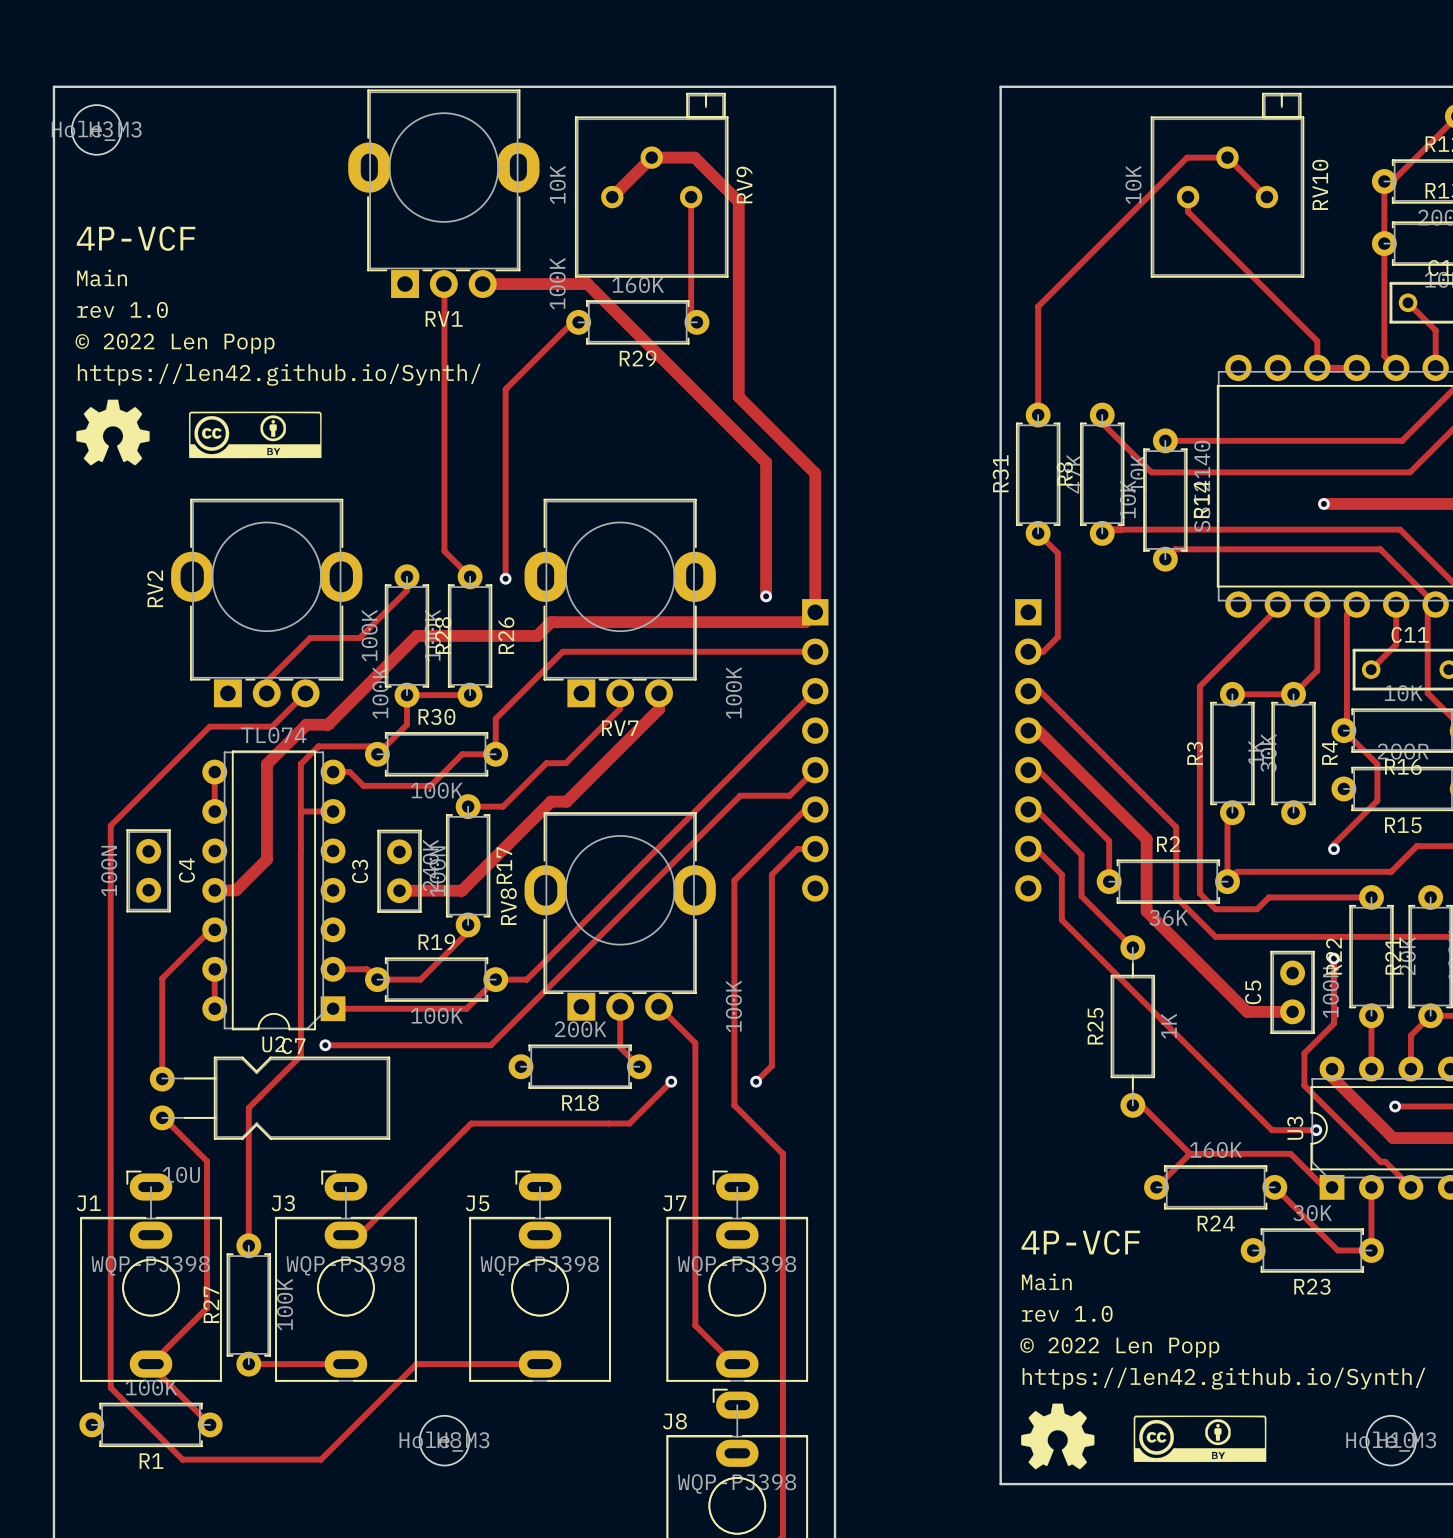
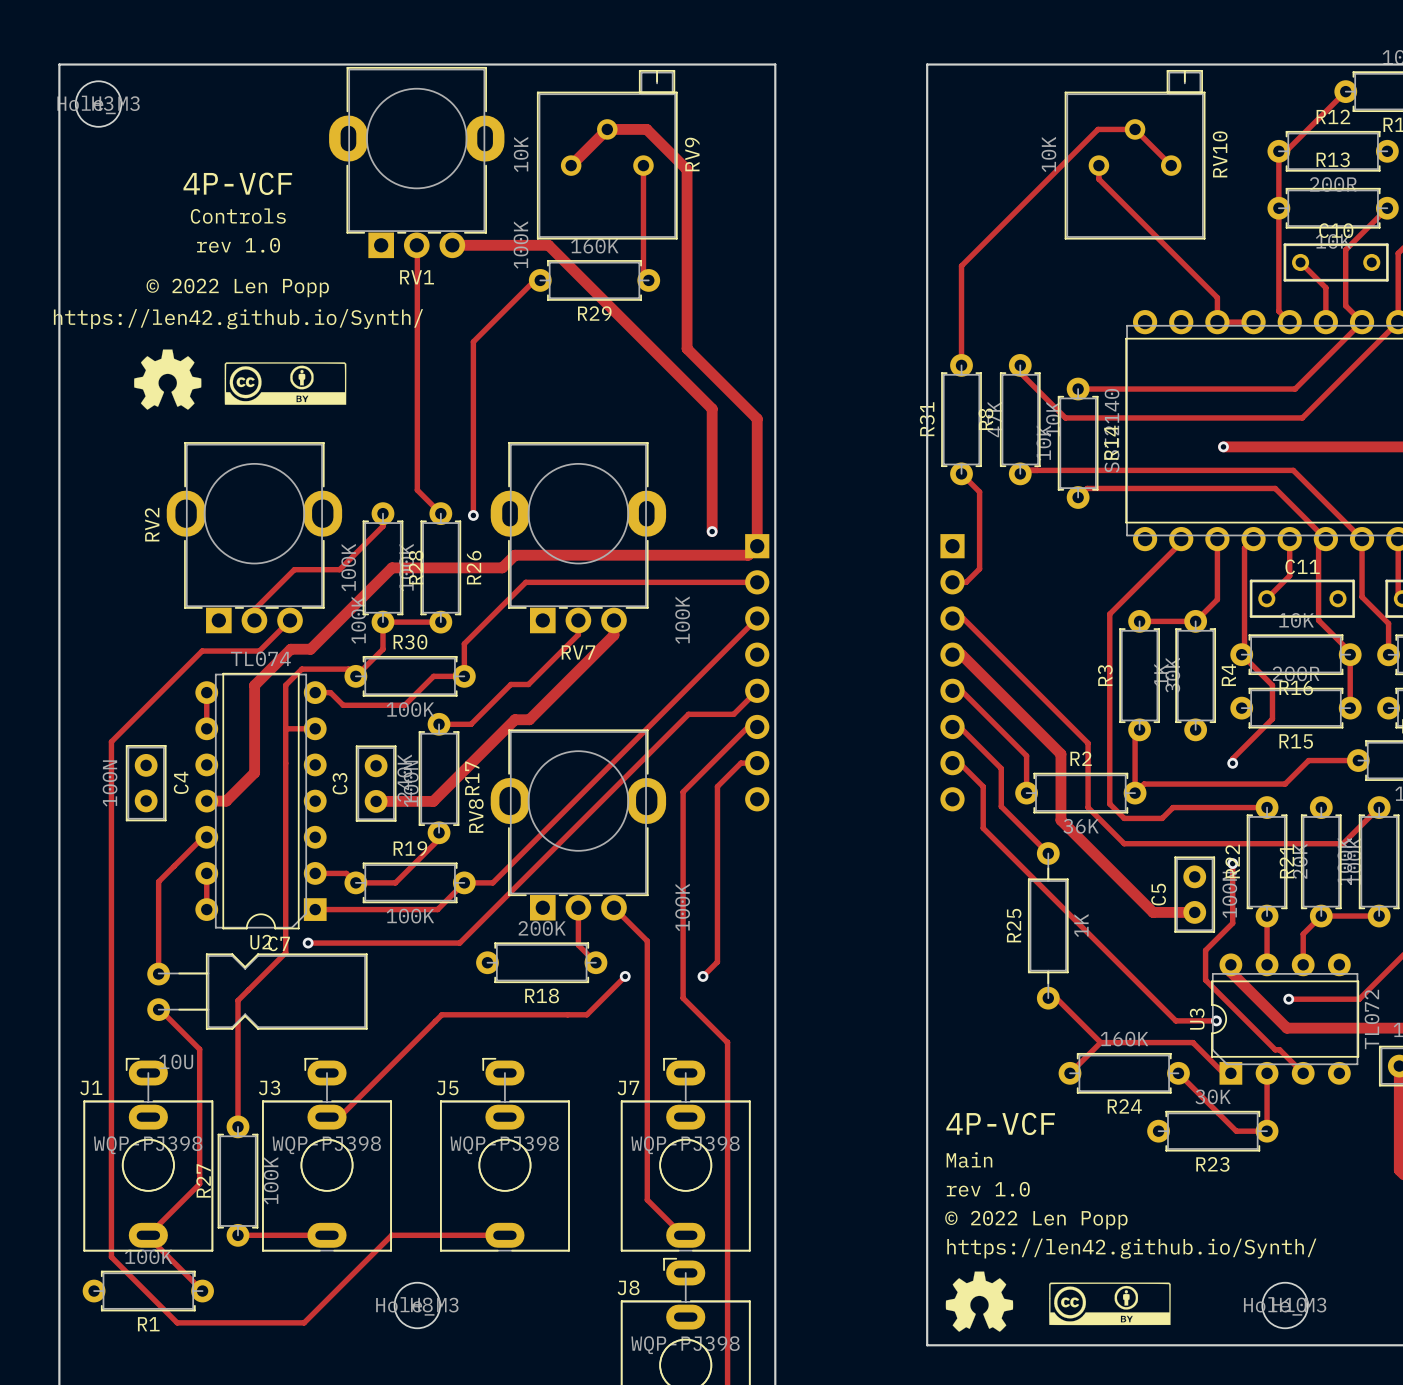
text position: 4P-VCF (136, 238) -> 4P-VCF (237, 183)
text: none -> Controls (238, 216)
text: Main (102, 277) -> none
text position: rev 1.0 (122, 309) -> rev 1.0 (238, 245)
text position: © 2022 Len Popp (175, 343) -> © 2022 Len Popp (237, 287)
text position: https://len42.github.io/Synth/ (279, 374) -> https://len42.github.io/Synth/ (238, 319)
drawing position: (112, 432) -> (167, 379)
drawing position: (255, 434) -> (285, 383)

